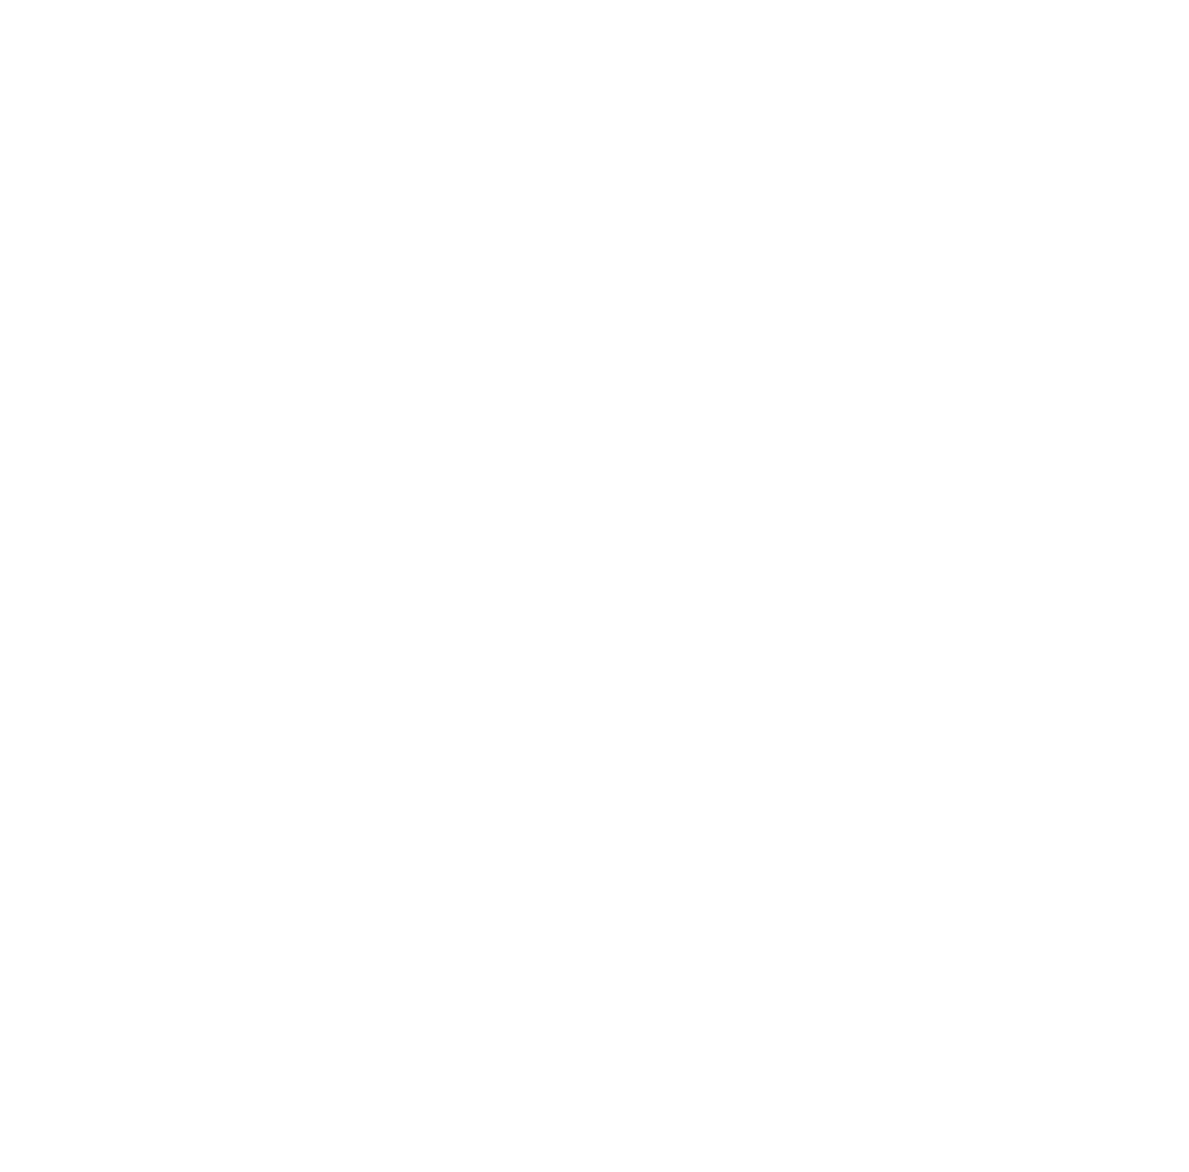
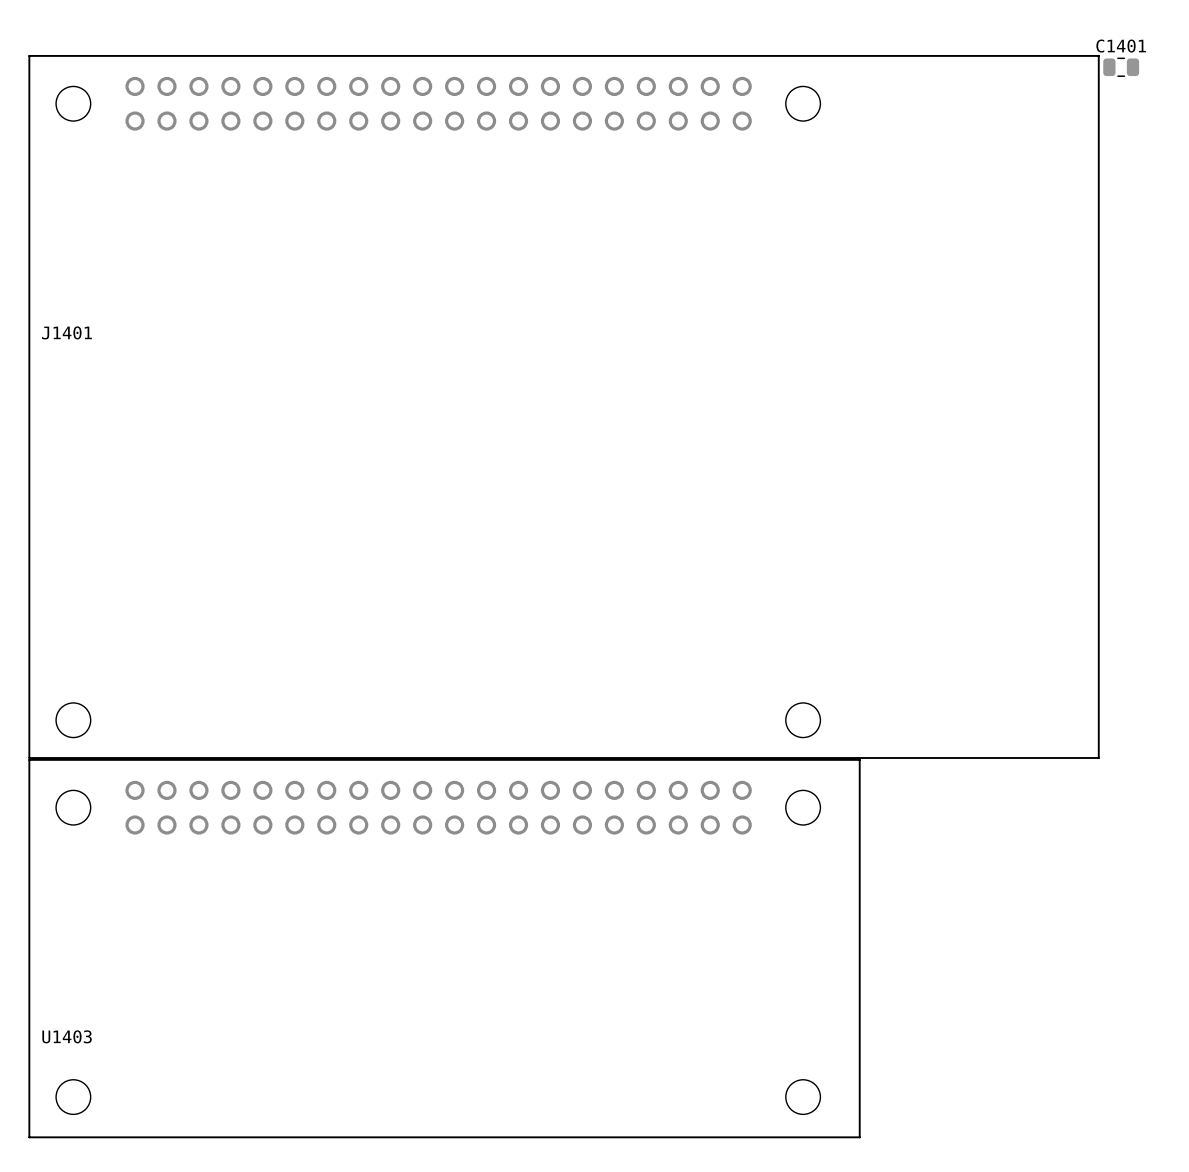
C1401: none -> (1121, 67)
J1401: none -> (564, 406)
U1403: none -> (444, 948)

